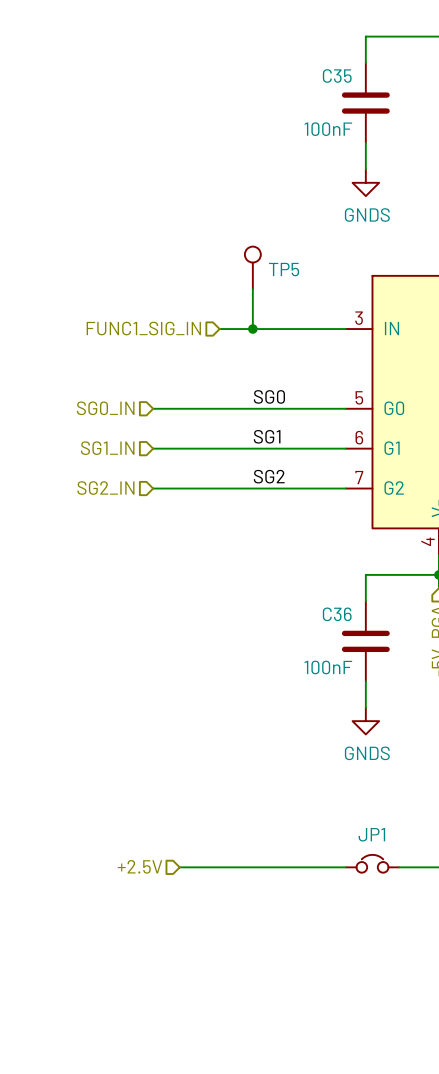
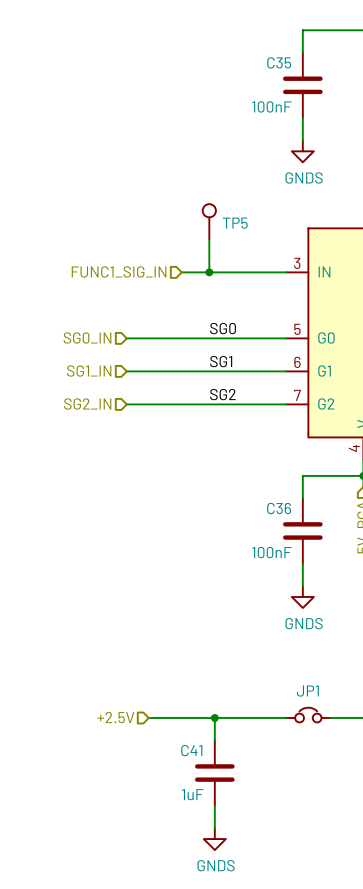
wire: none -> (214, 718) (214, 740)
junction: none -> (214, 718)
C41: none -> 1uF (214, 773)
wire: none -> (214, 806) (214, 828)
power symbol: none -> GNDS (214, 839)

